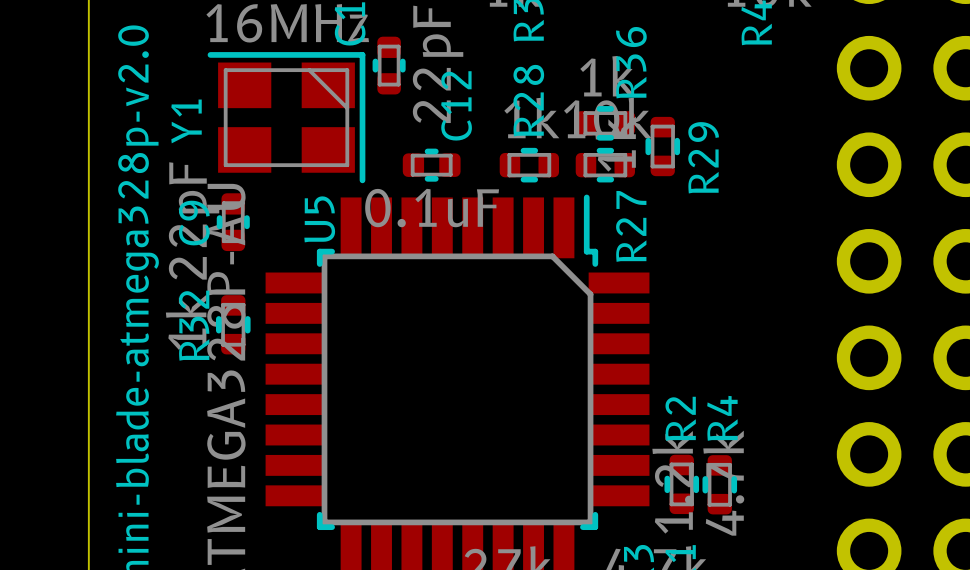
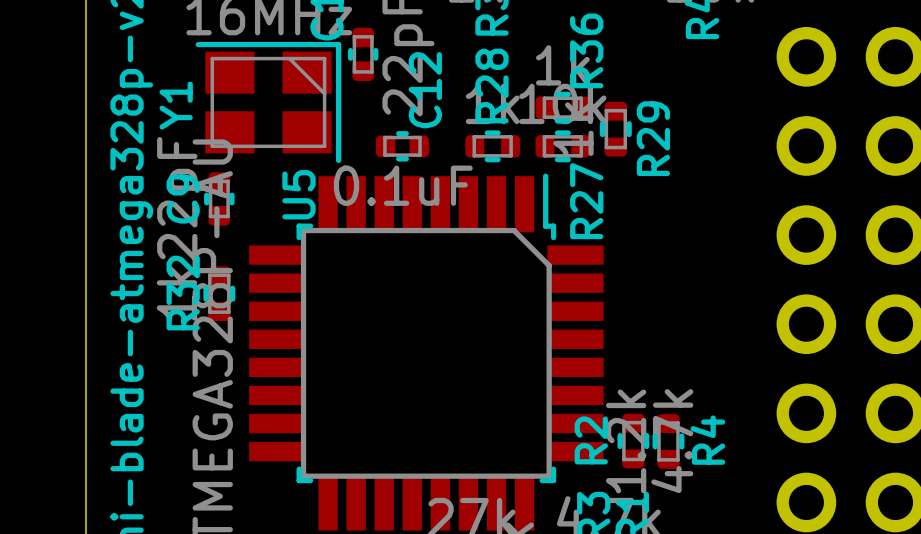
R2 name position: R2 (680, 418) -> R2 (591, 440)
R4 name position: R4 (722, 418) -> R4 (707, 440)

